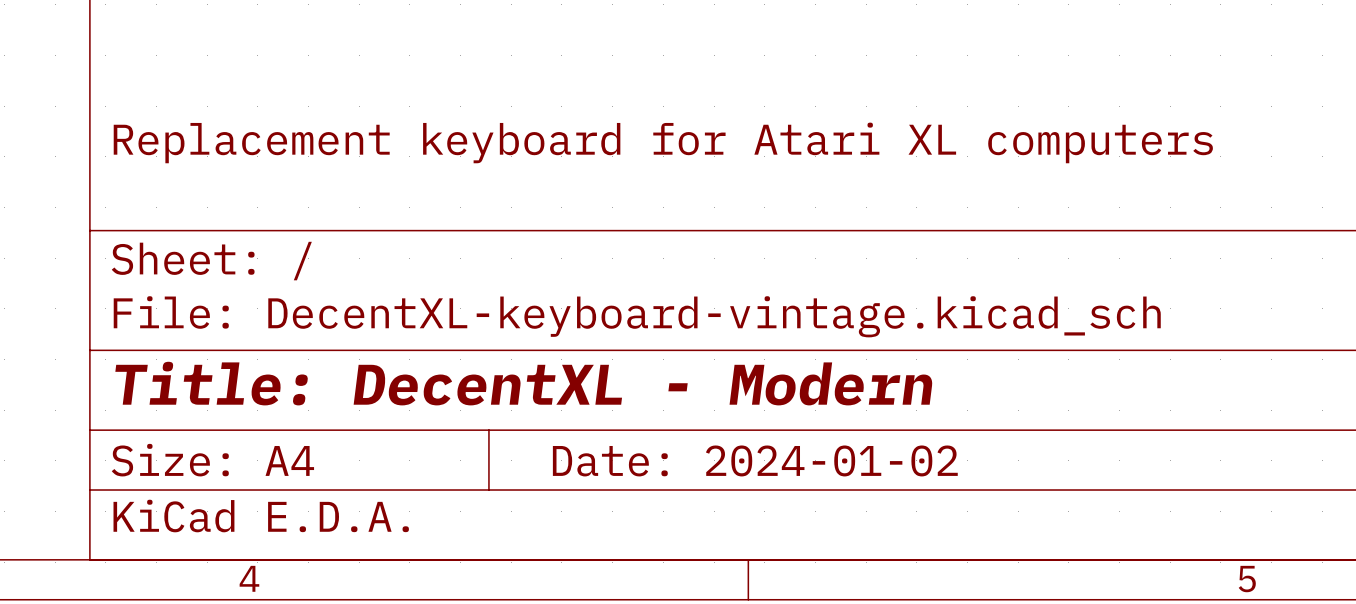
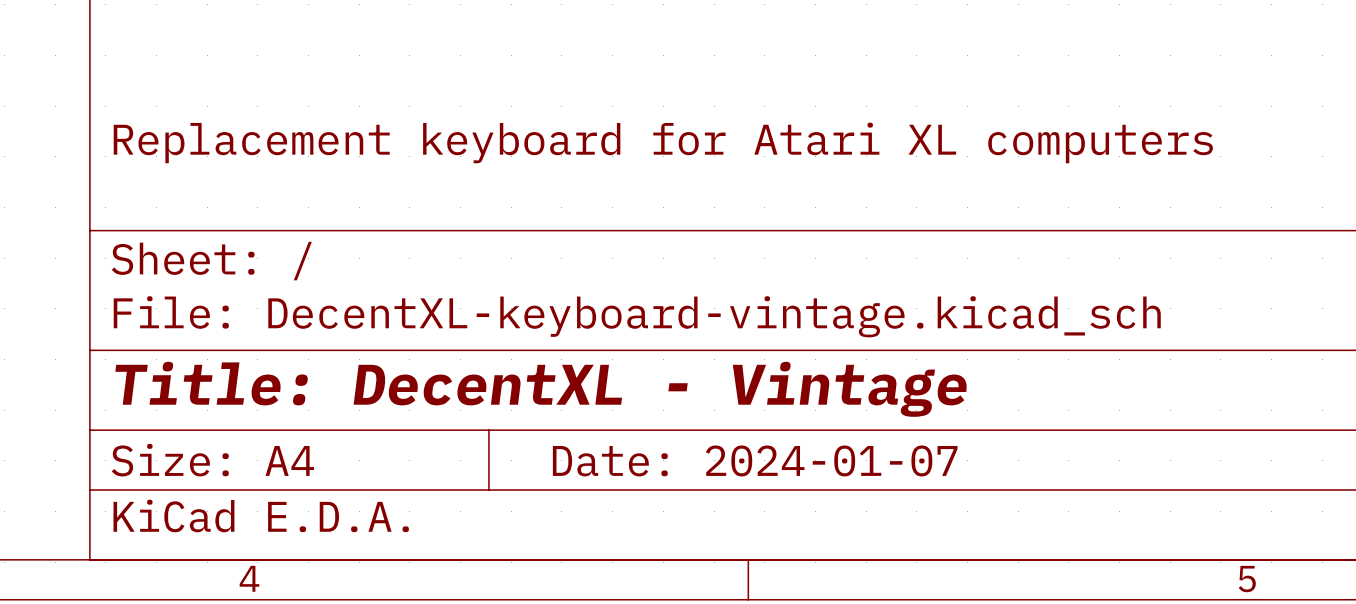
title block: Title: DecentXL - Modern (523, 383) -> Title: DecentXL - Vintage (541, 389)
title block: Date: 2024-01-02 (755, 460) -> Date: 2024-01-07 (755, 460)

